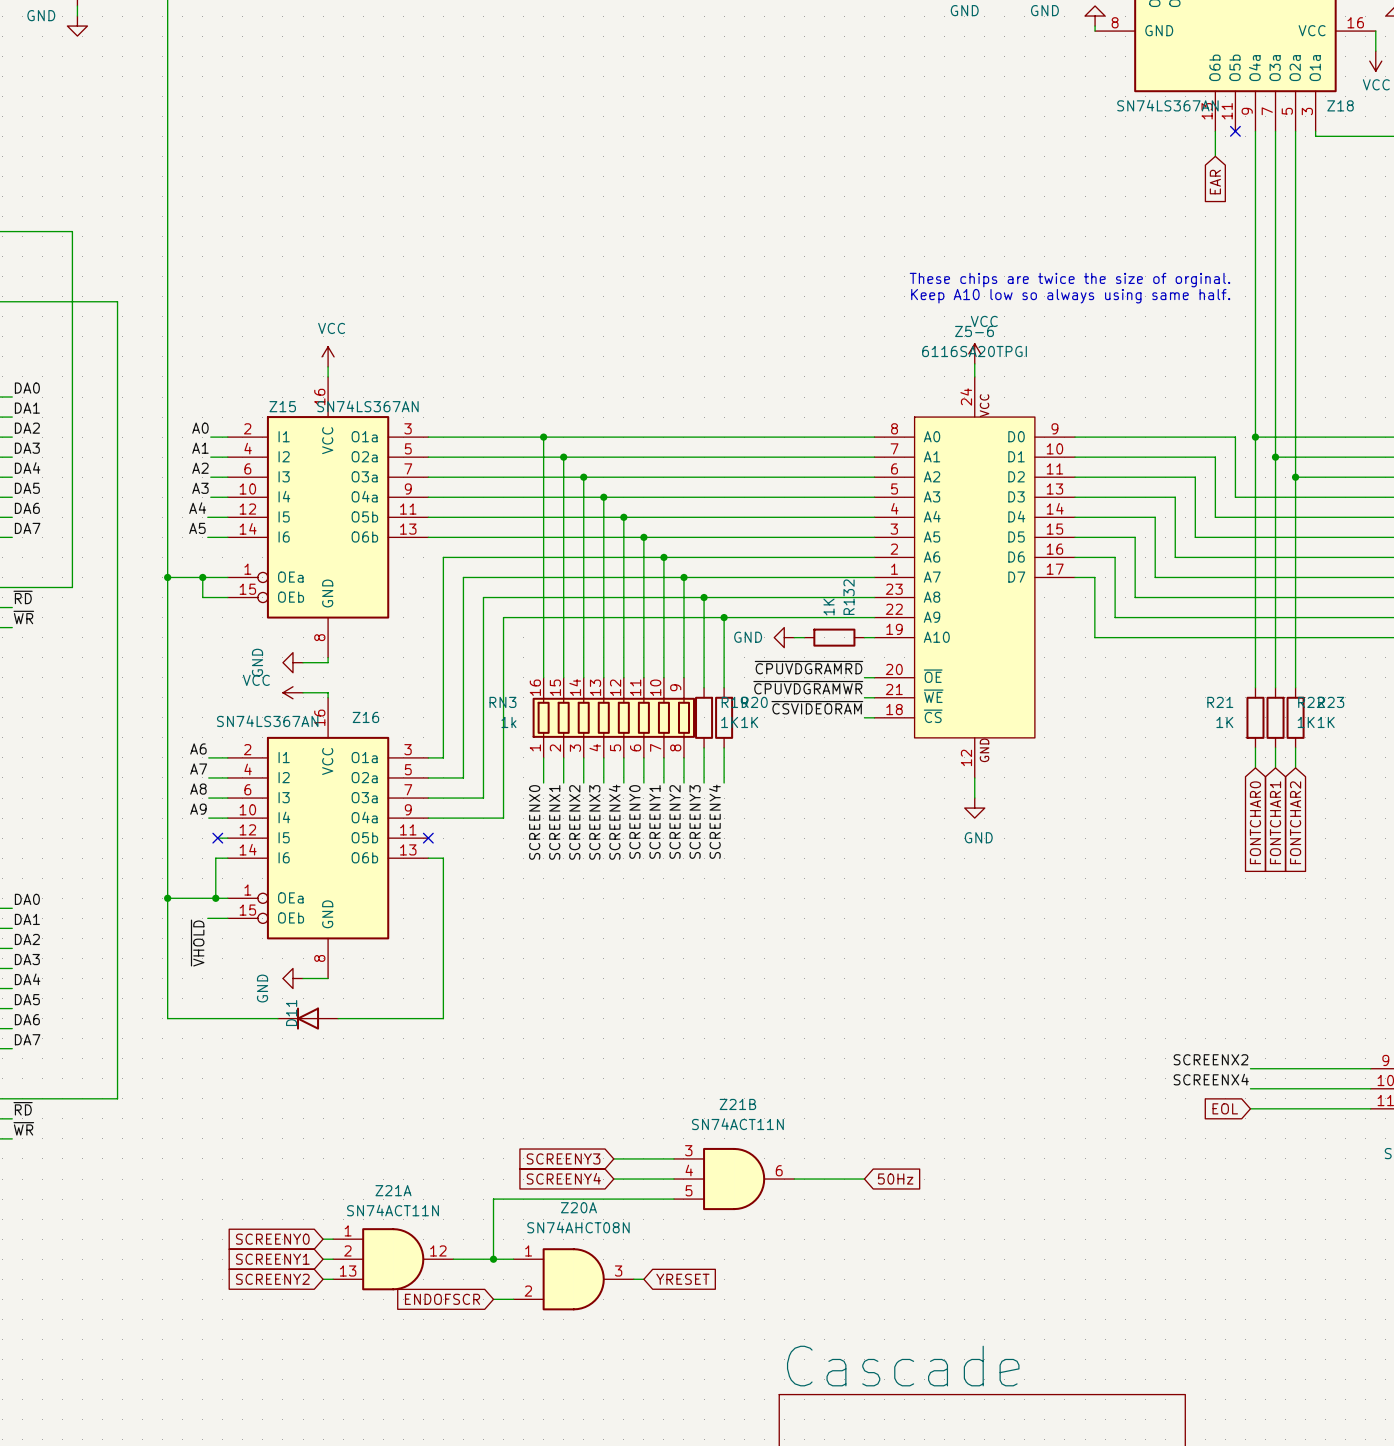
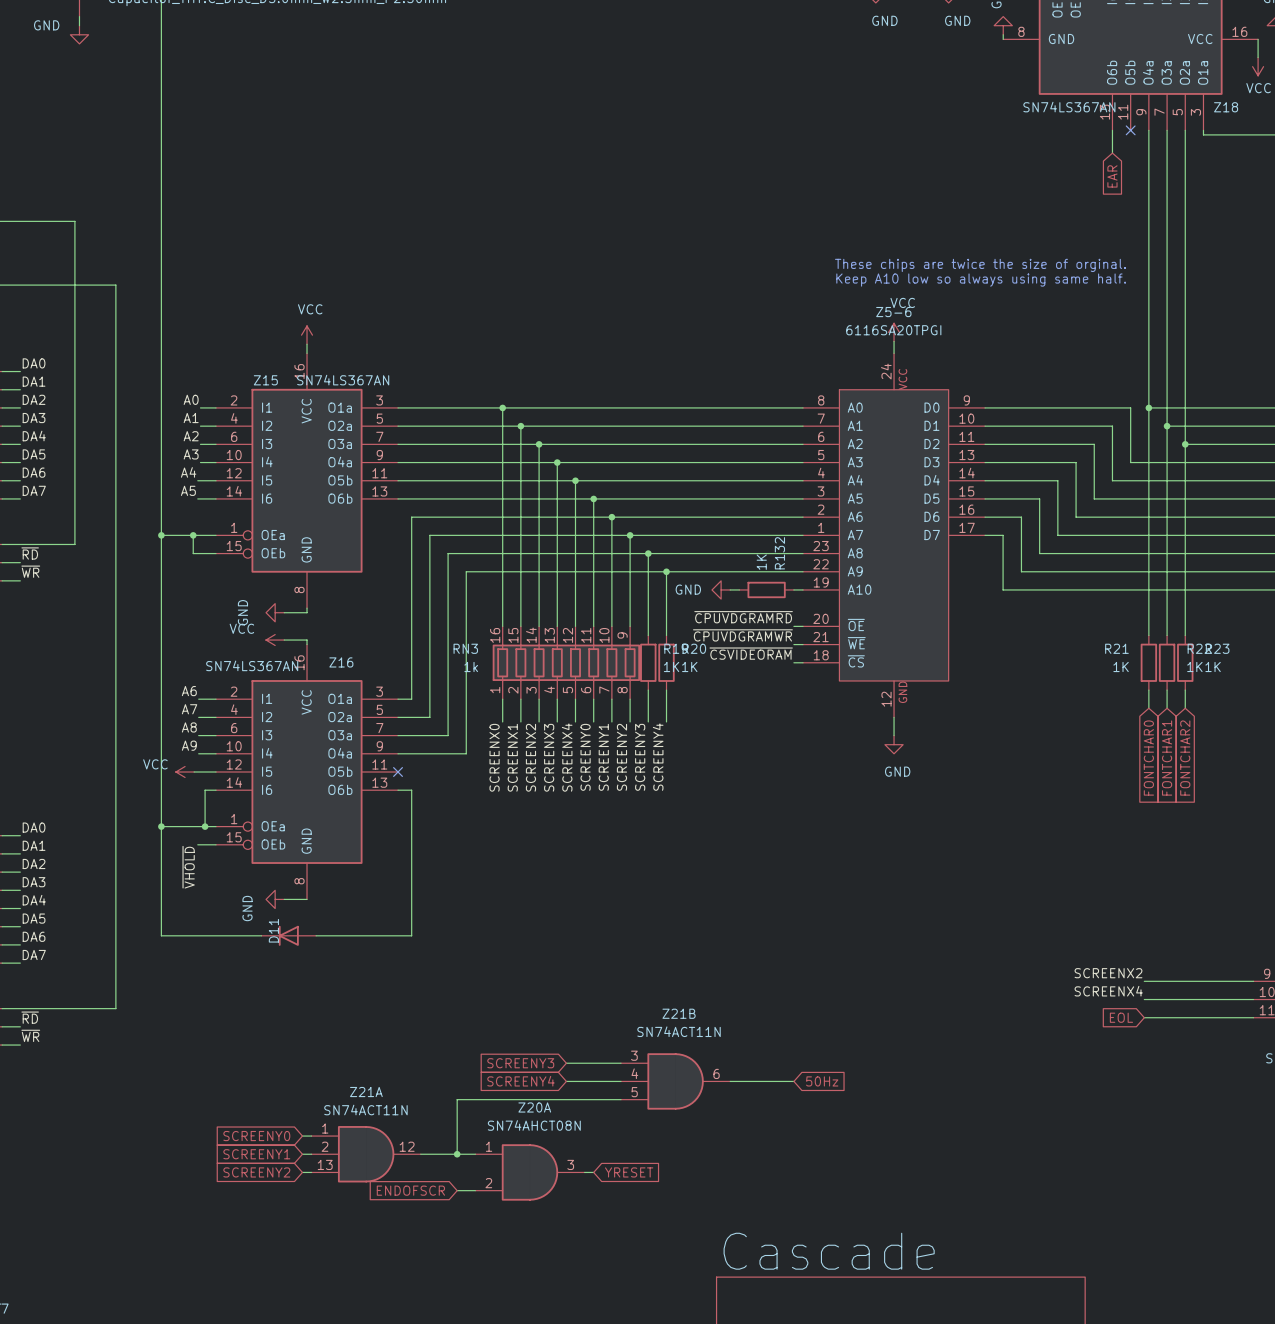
power symbol: none -> VCC (185, 772)
wire: none -> (194, 772) (206, 772)
no-connect mark: (217, 838) -> none

